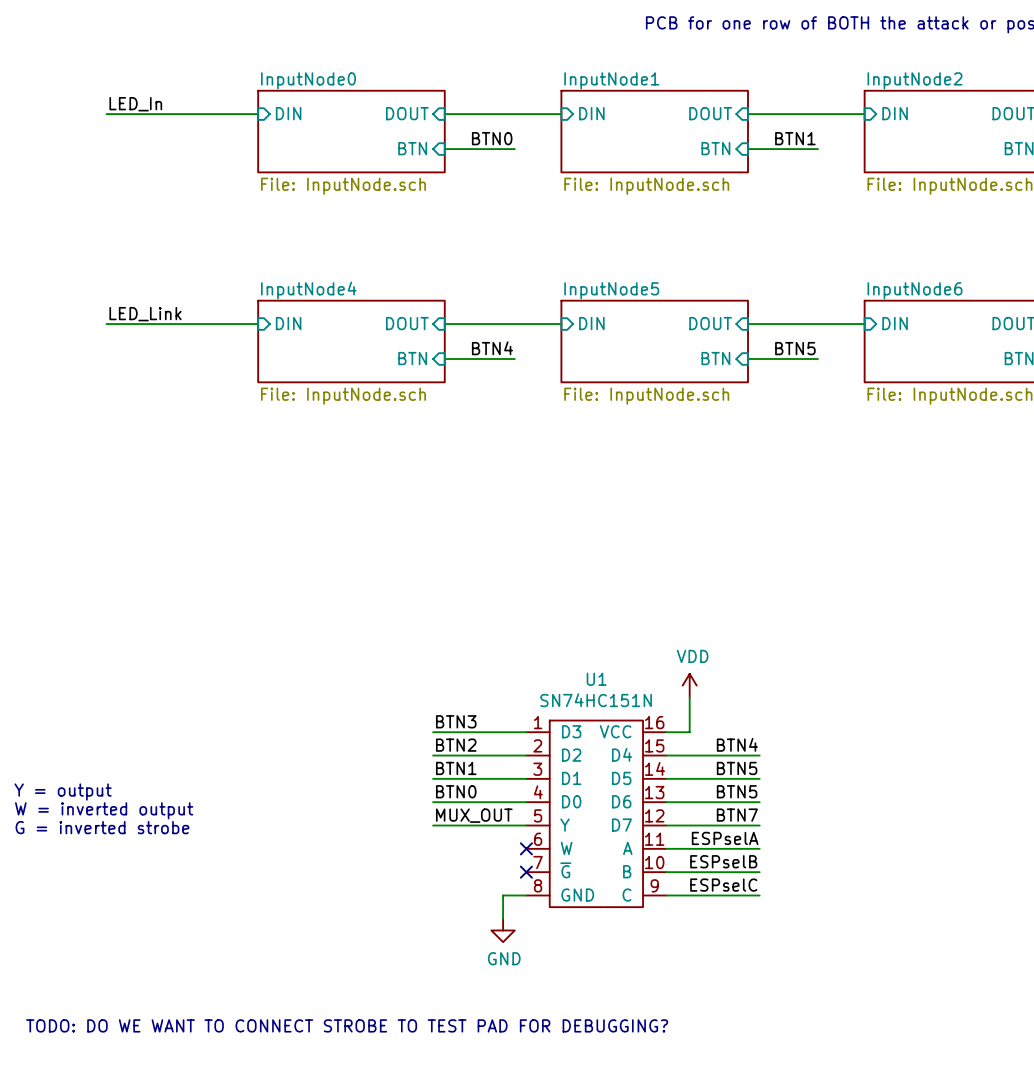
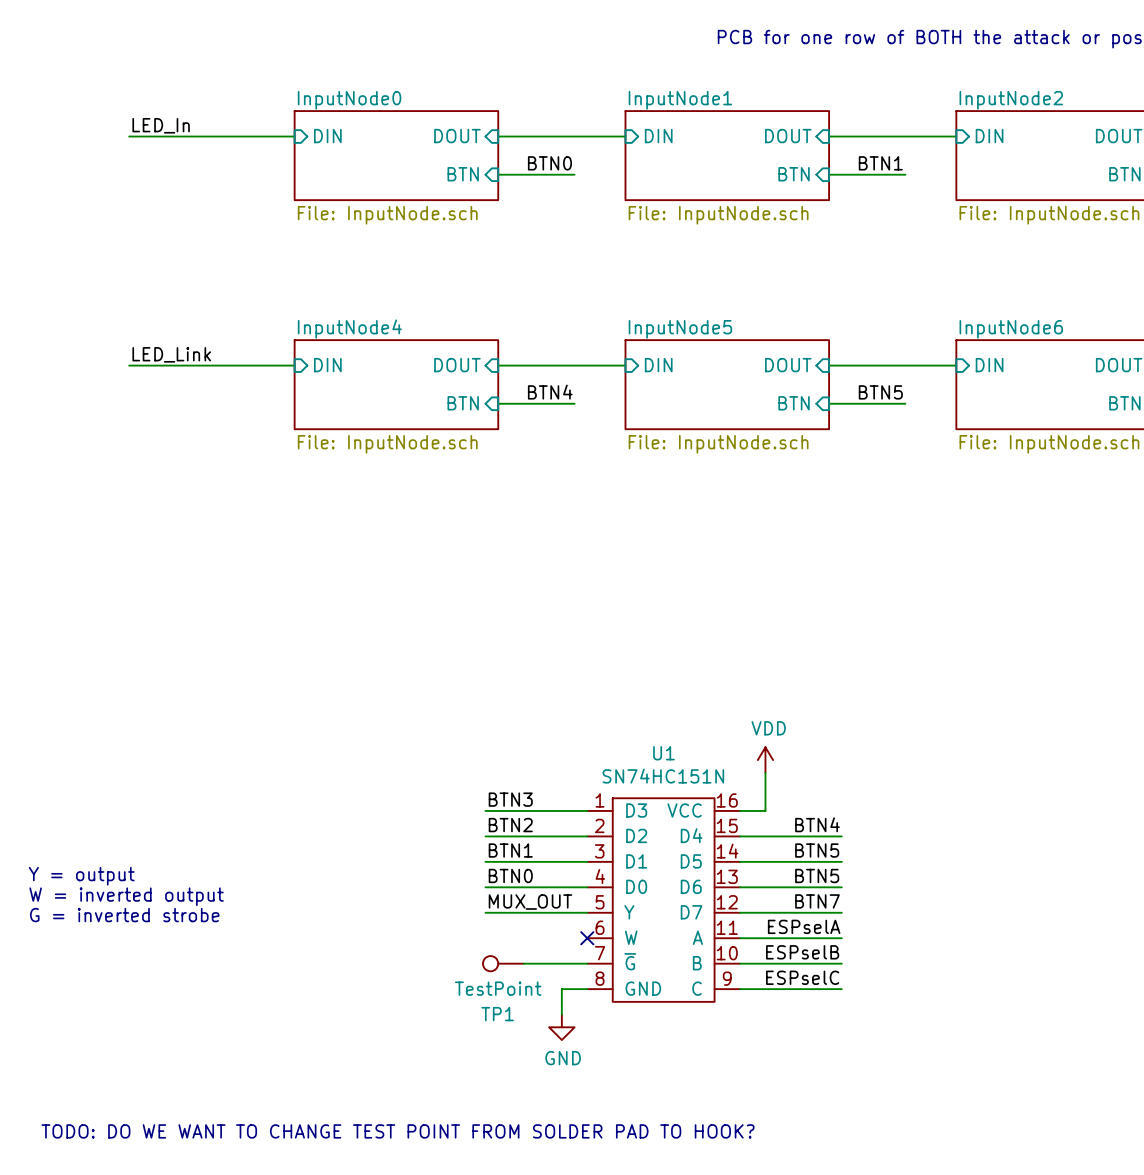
TP1: none -> TestPoint (503, 963)
wire: none -> (523, 963) (587, 963)
no-connect mark: (526, 872) -> none
text: TODO: DO WE WANT TO CONNECT STROBE TO TEST PAD FOR DEBUGGING? (347, 1025) -> TODO: DO WE WANT TO CHANGE TEST POINT FROM SOLDER PAD TO HOOK? (398, 1131)

